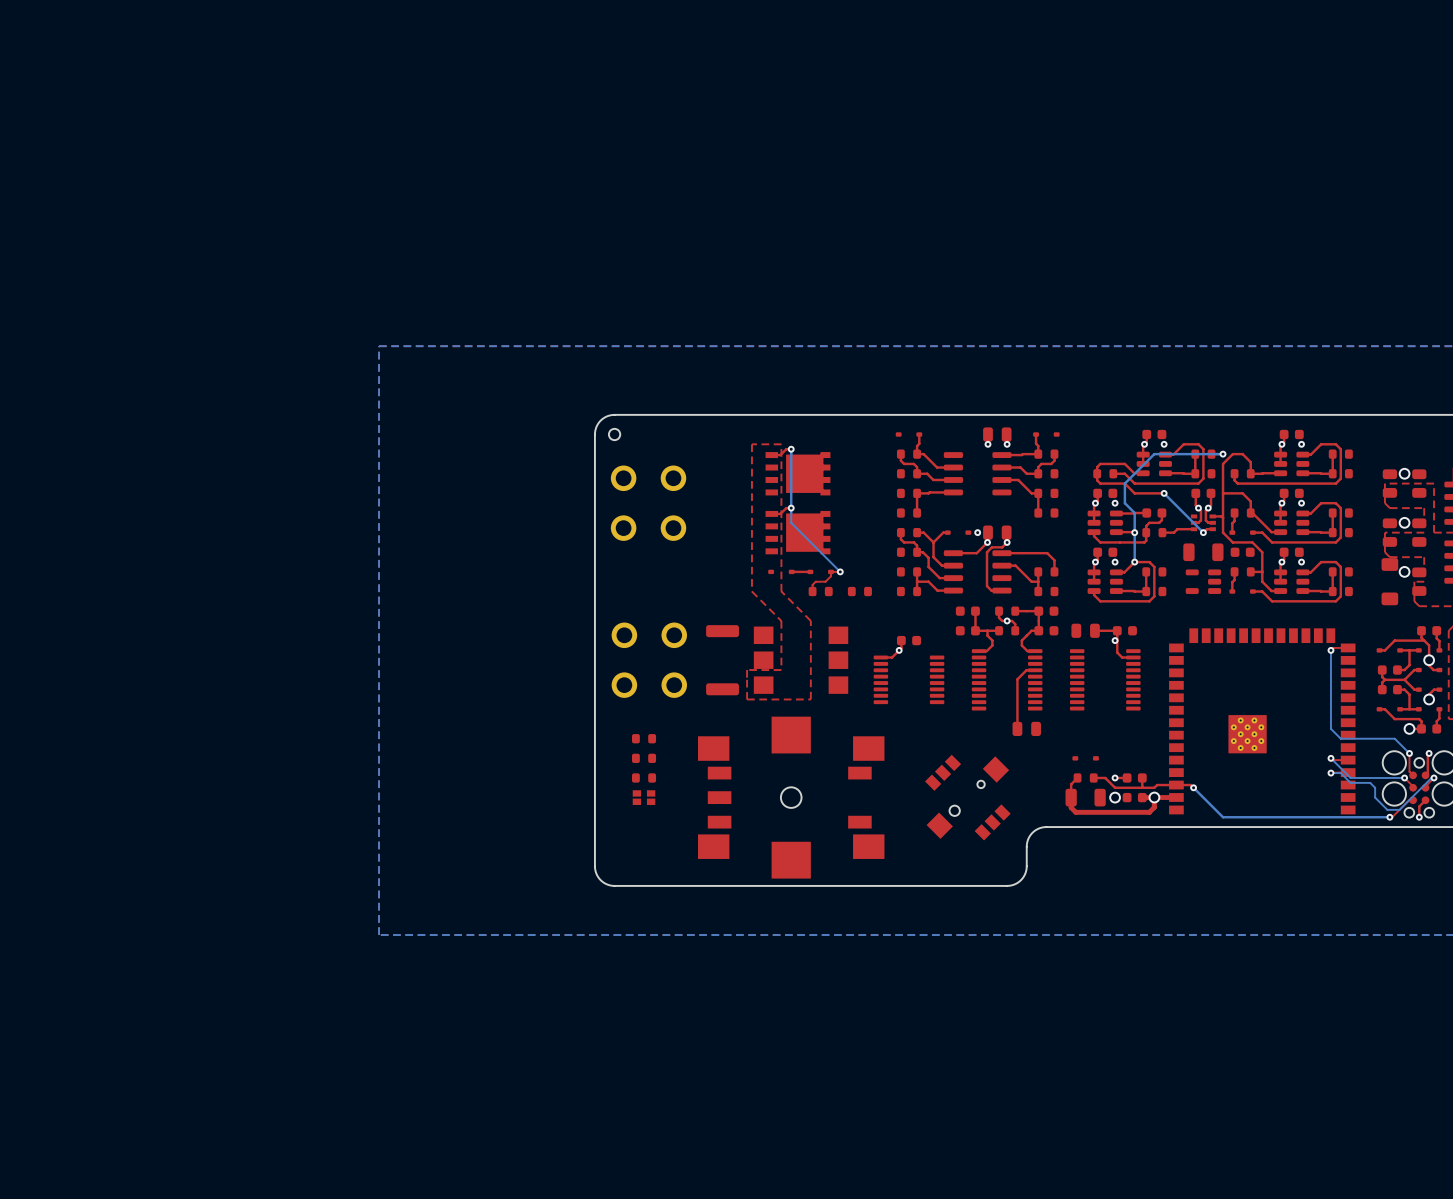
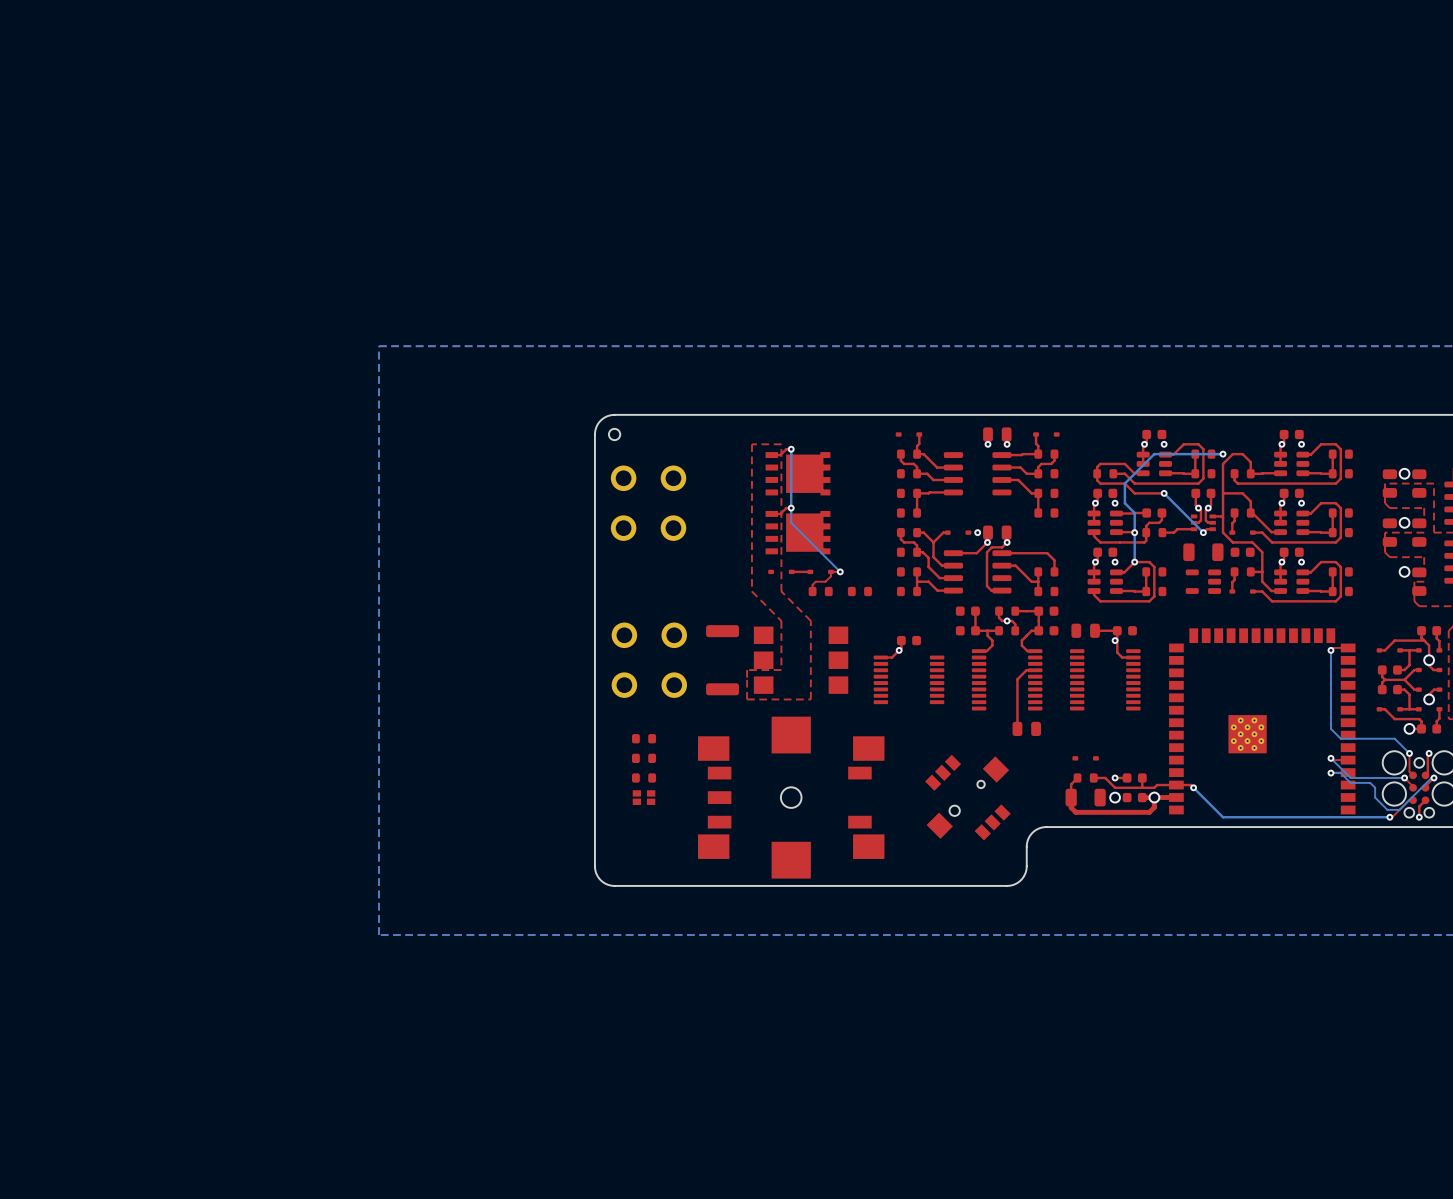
part: (1389, 581) -> none

